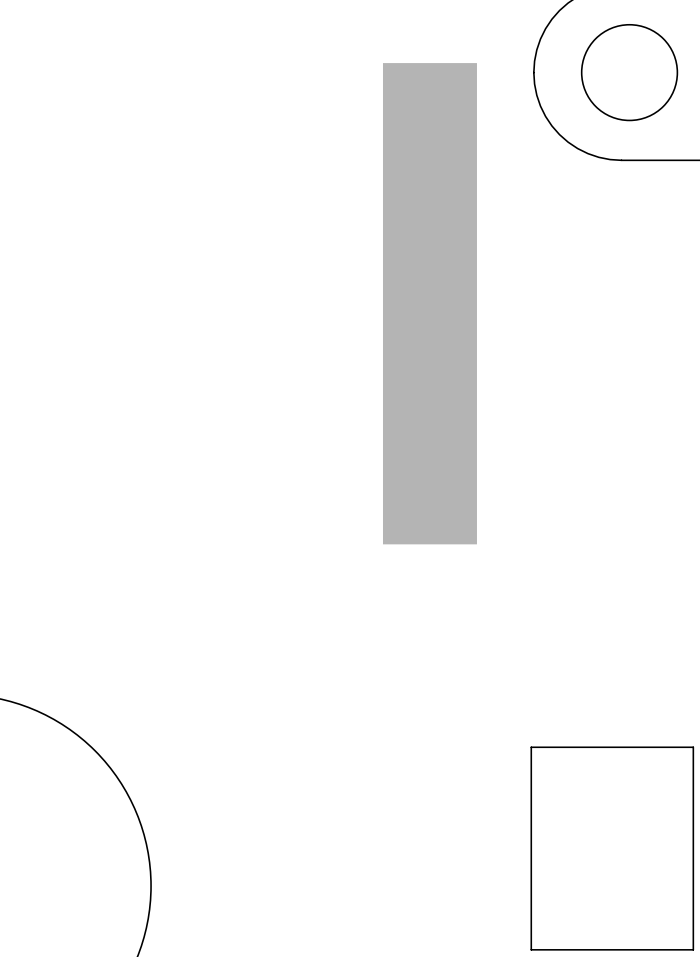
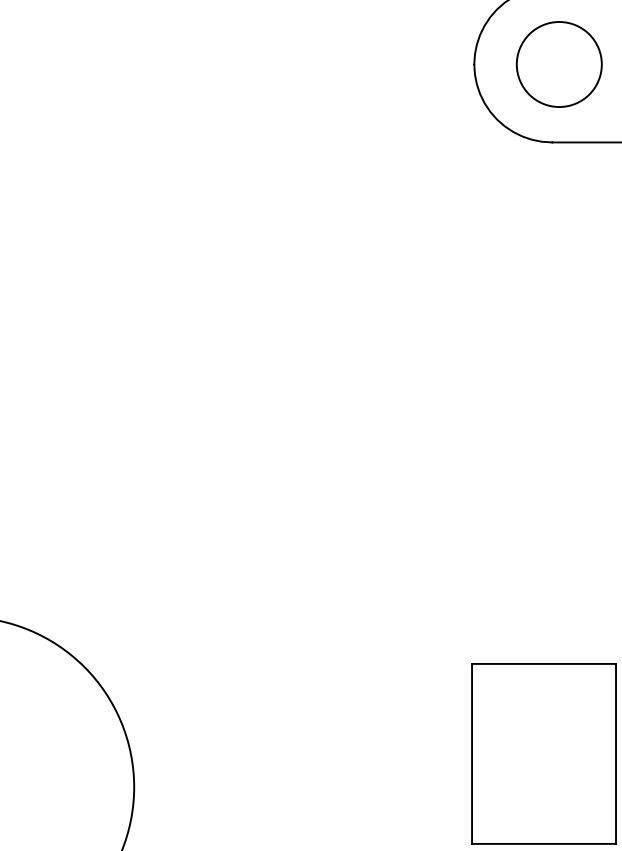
drawing: [382, 63, 477, 545] -> none

